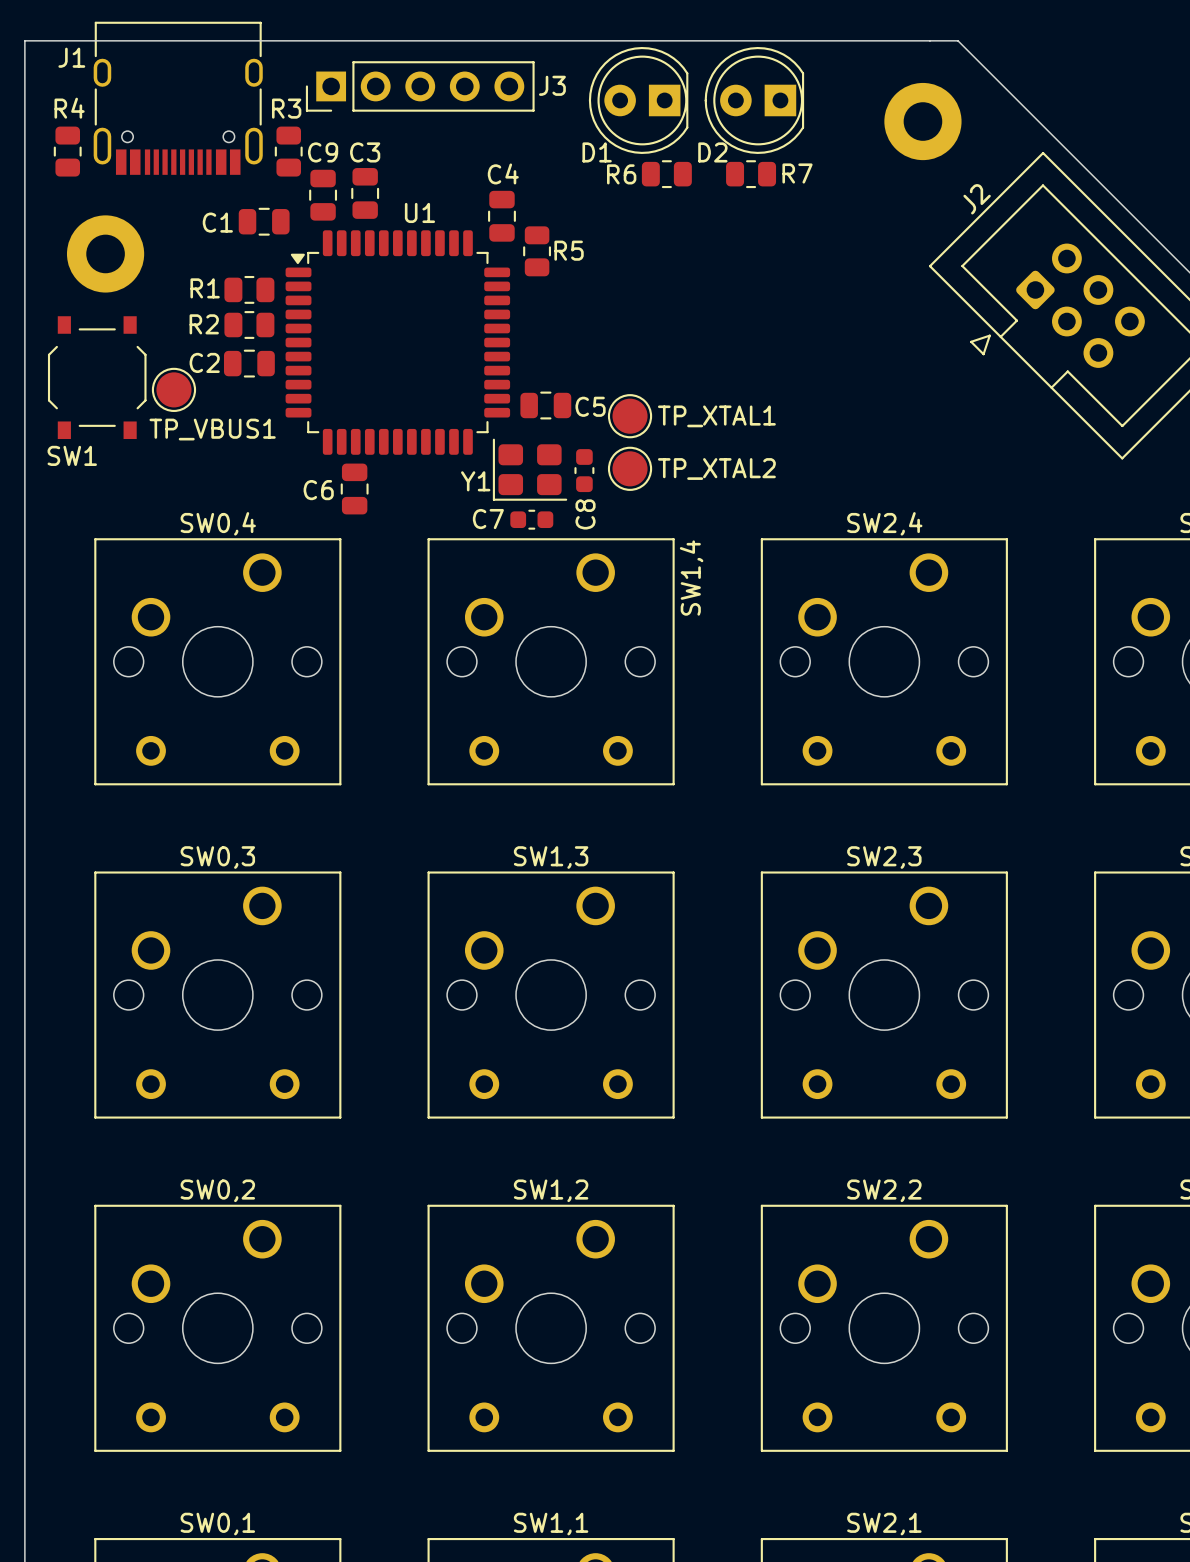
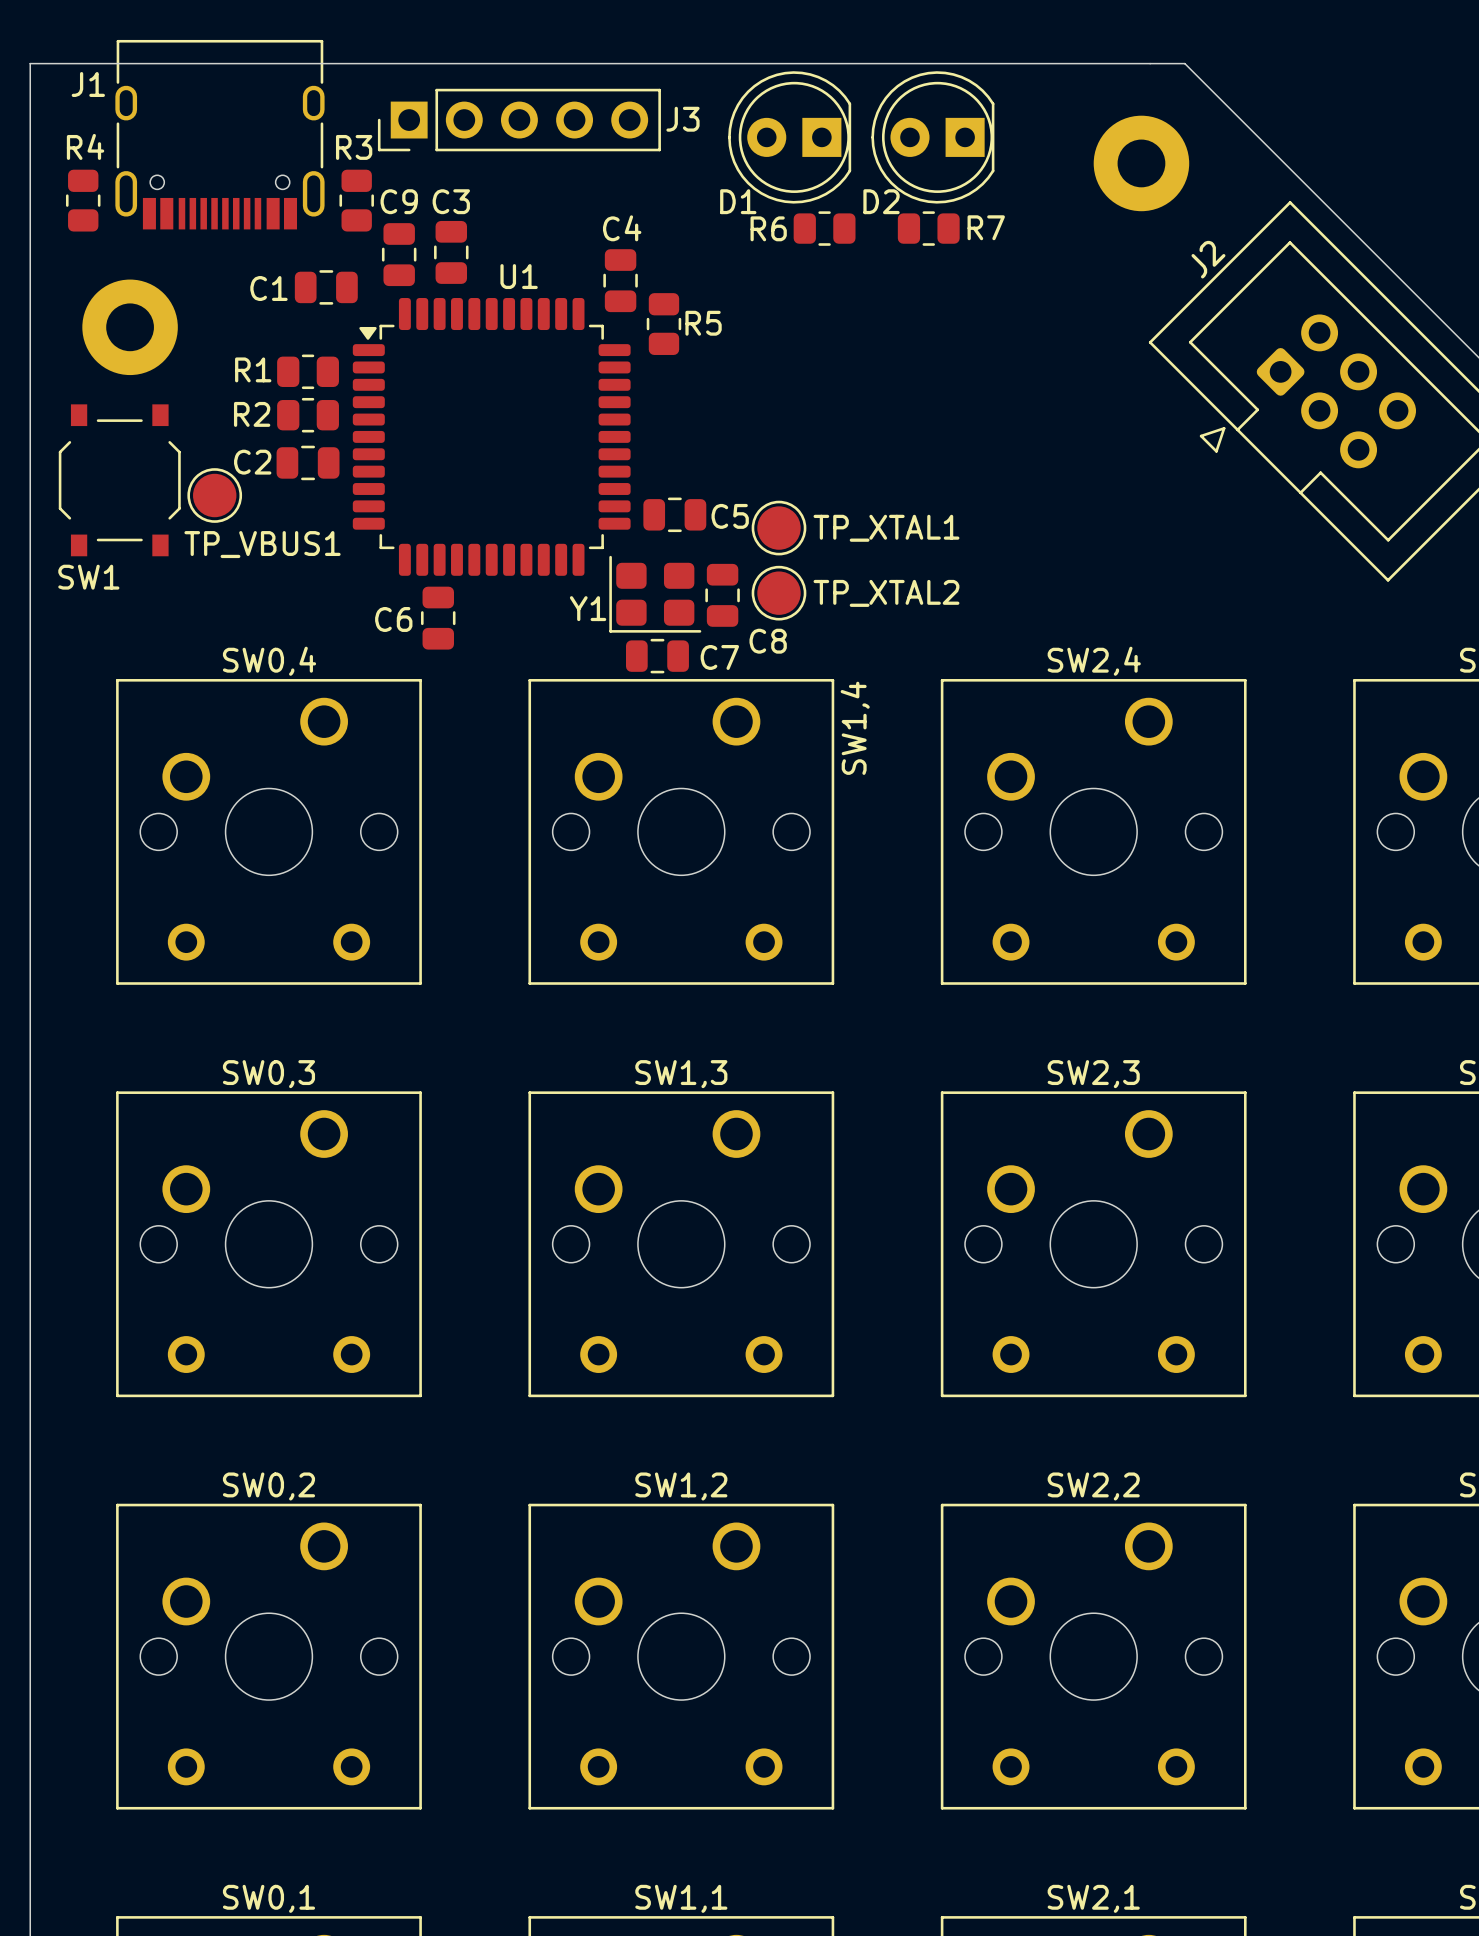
C8 footprint: [574, 449, 595, 493] -> [705, 563, 740, 627]
C7 footprint: [510, 509, 554, 530] -> [626, 638, 689, 674]
C8 name rotation: 0° (585, 514) -> 90° clockwise (768, 641)
C7 name position: C7 (488, 519) -> C7 (719, 657)

